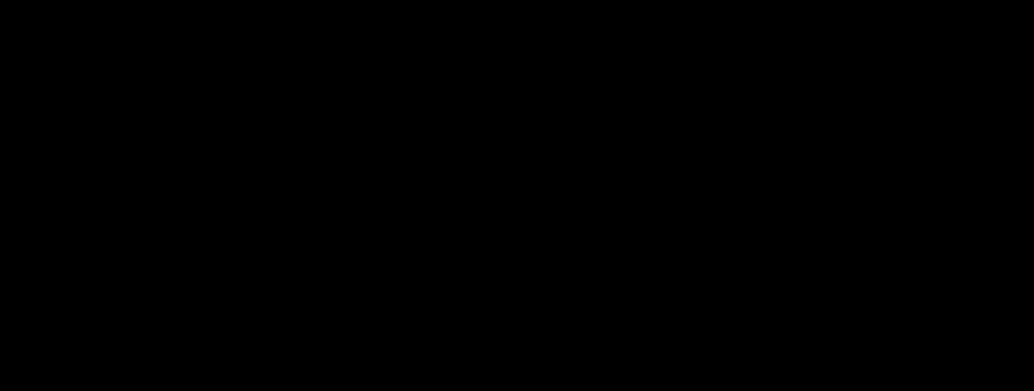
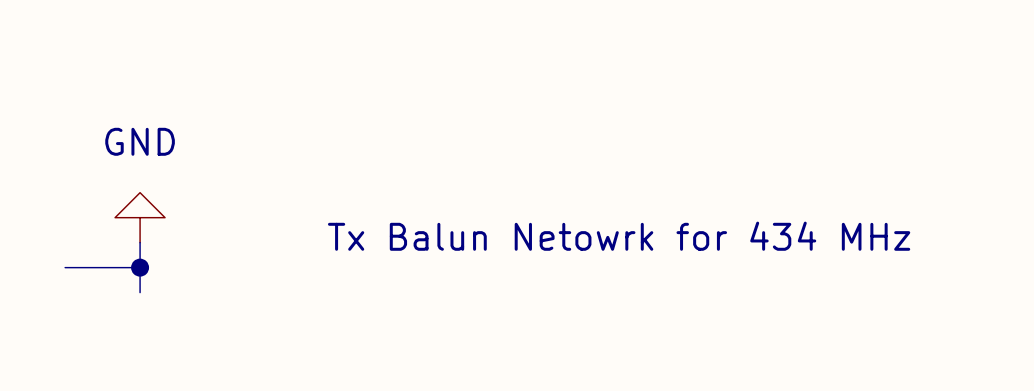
power symbol: none -> GND (140, 217)
text: none -> Tx Balun Netowrk for 434 MHz (619, 236)
wire: none -> (140, 242) (140, 292)
wire: none -> (65, 267) (140, 267)
junction: none -> (140, 267)

